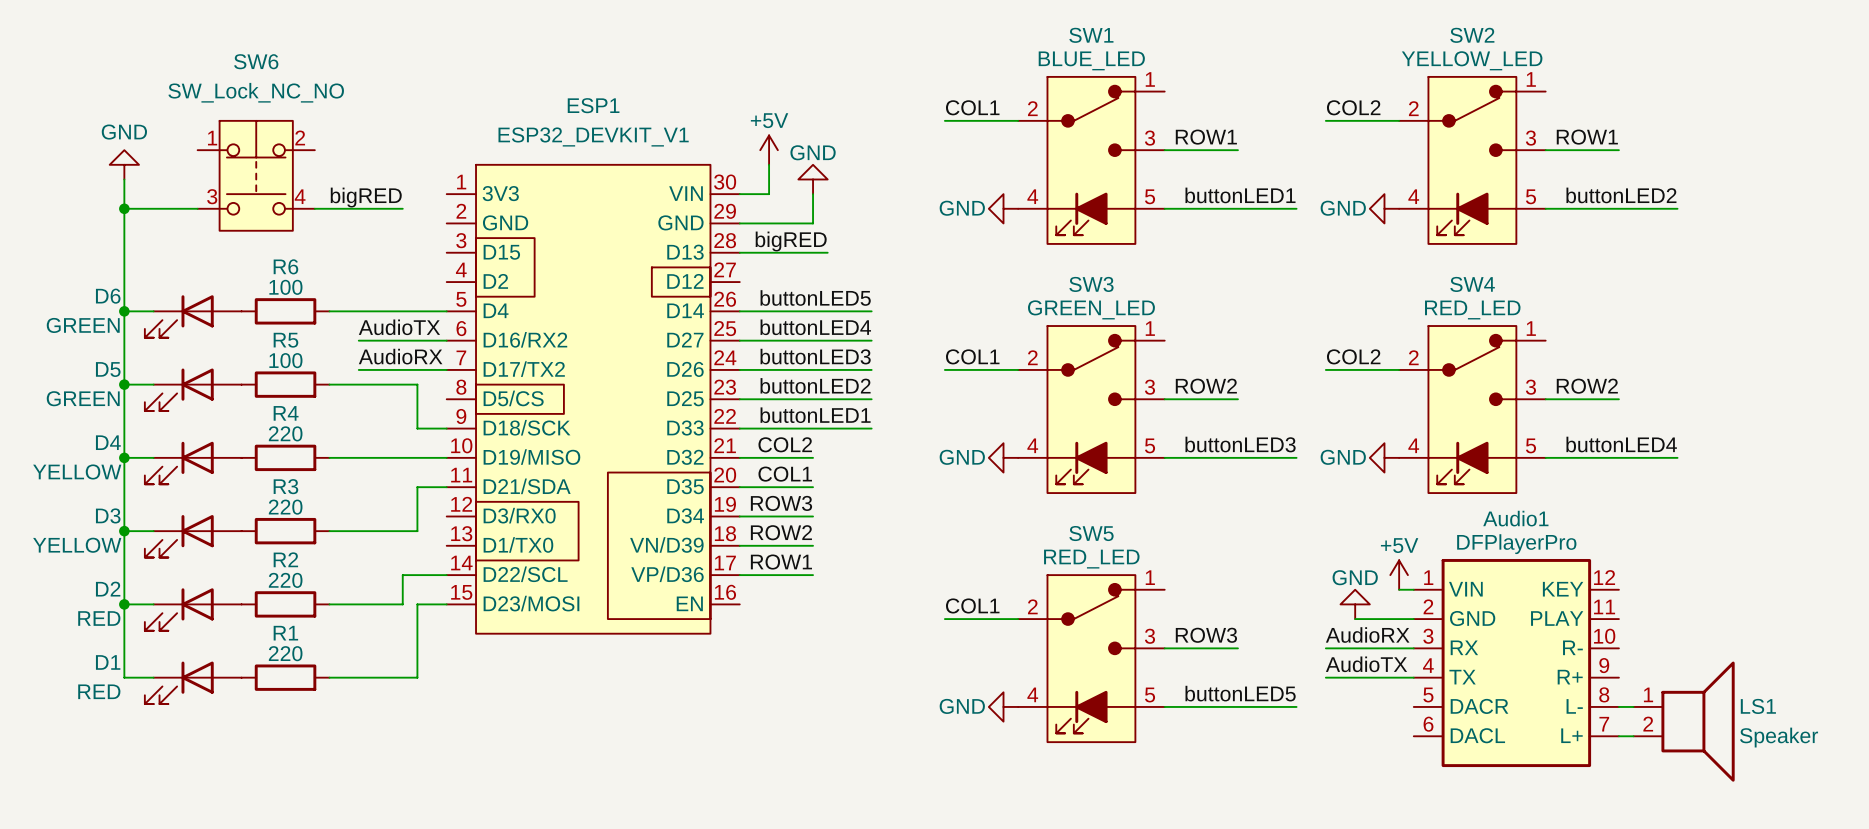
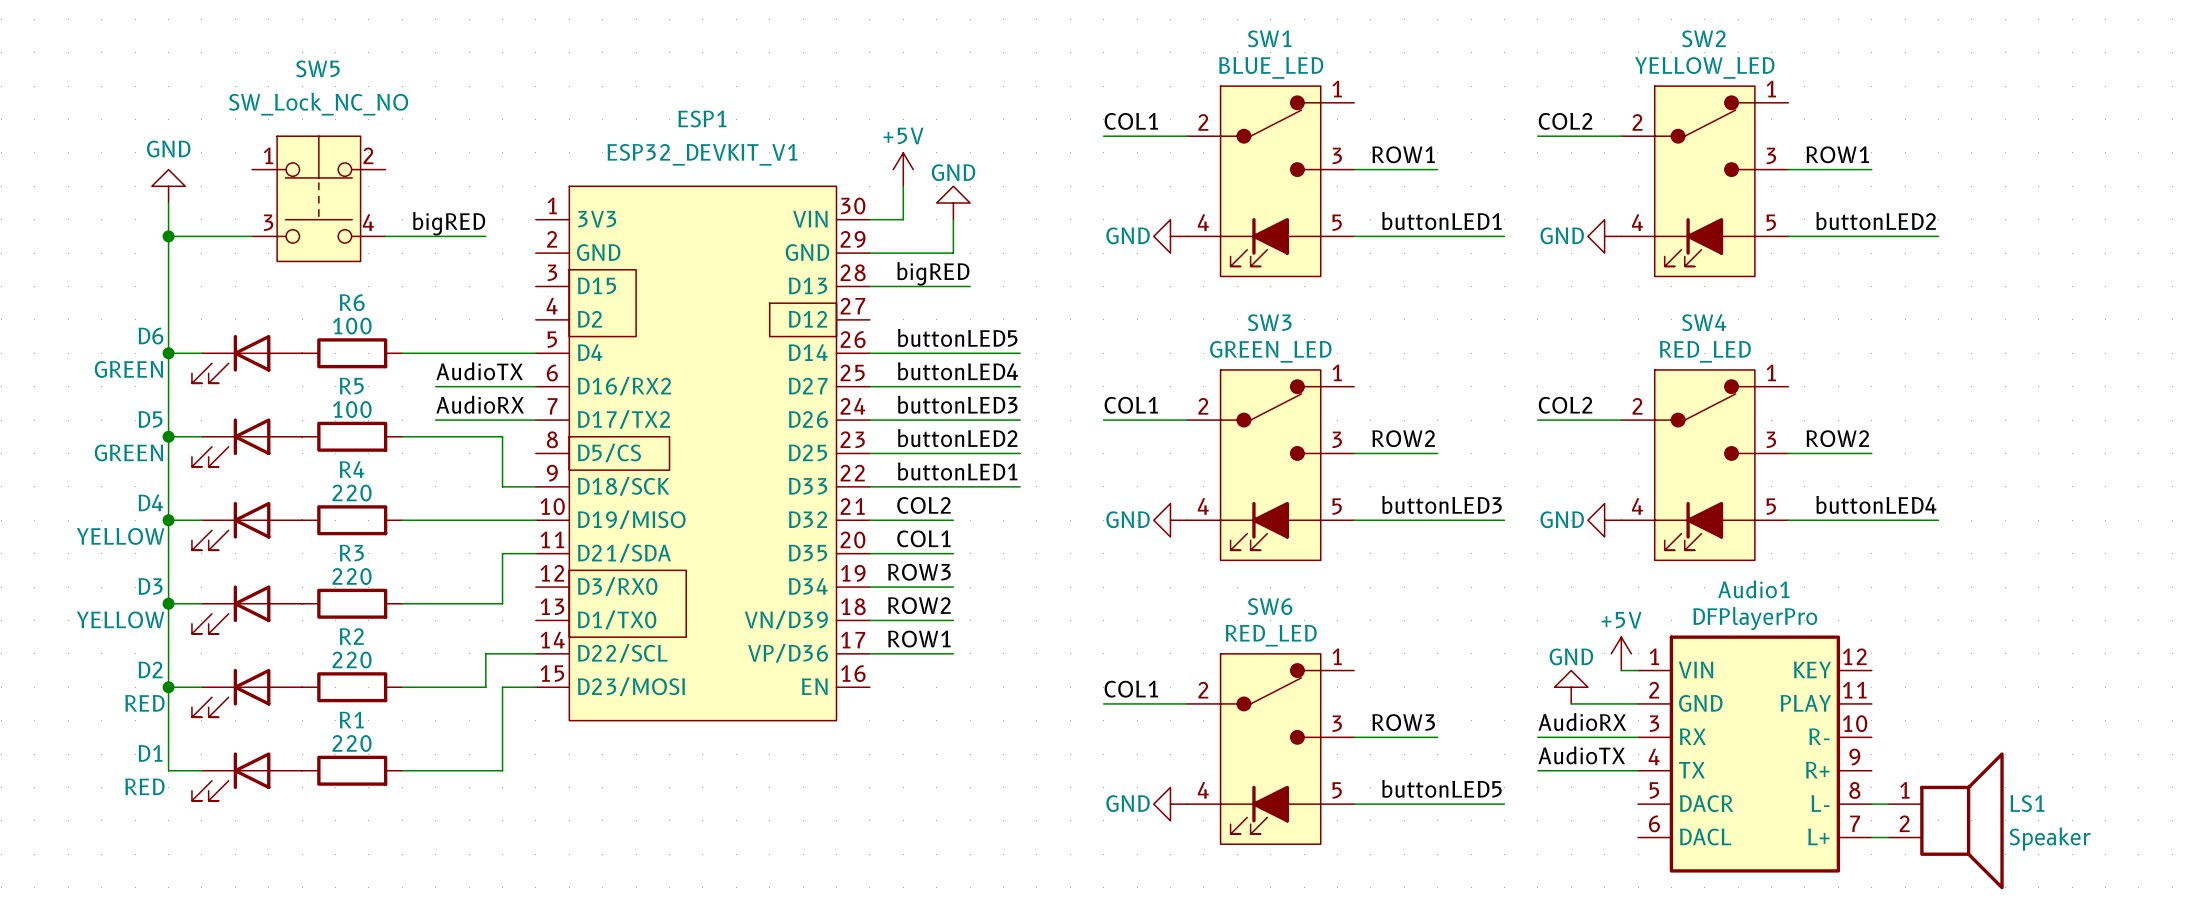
SW6 name: SW6 (256, 61) -> SW5 (317, 68)
ESP1 symbol: [446, 164, 740, 634] -> [535, 186, 870, 721]
SW5 name: SW5 (1091, 533) -> SW6 (1270, 606)

